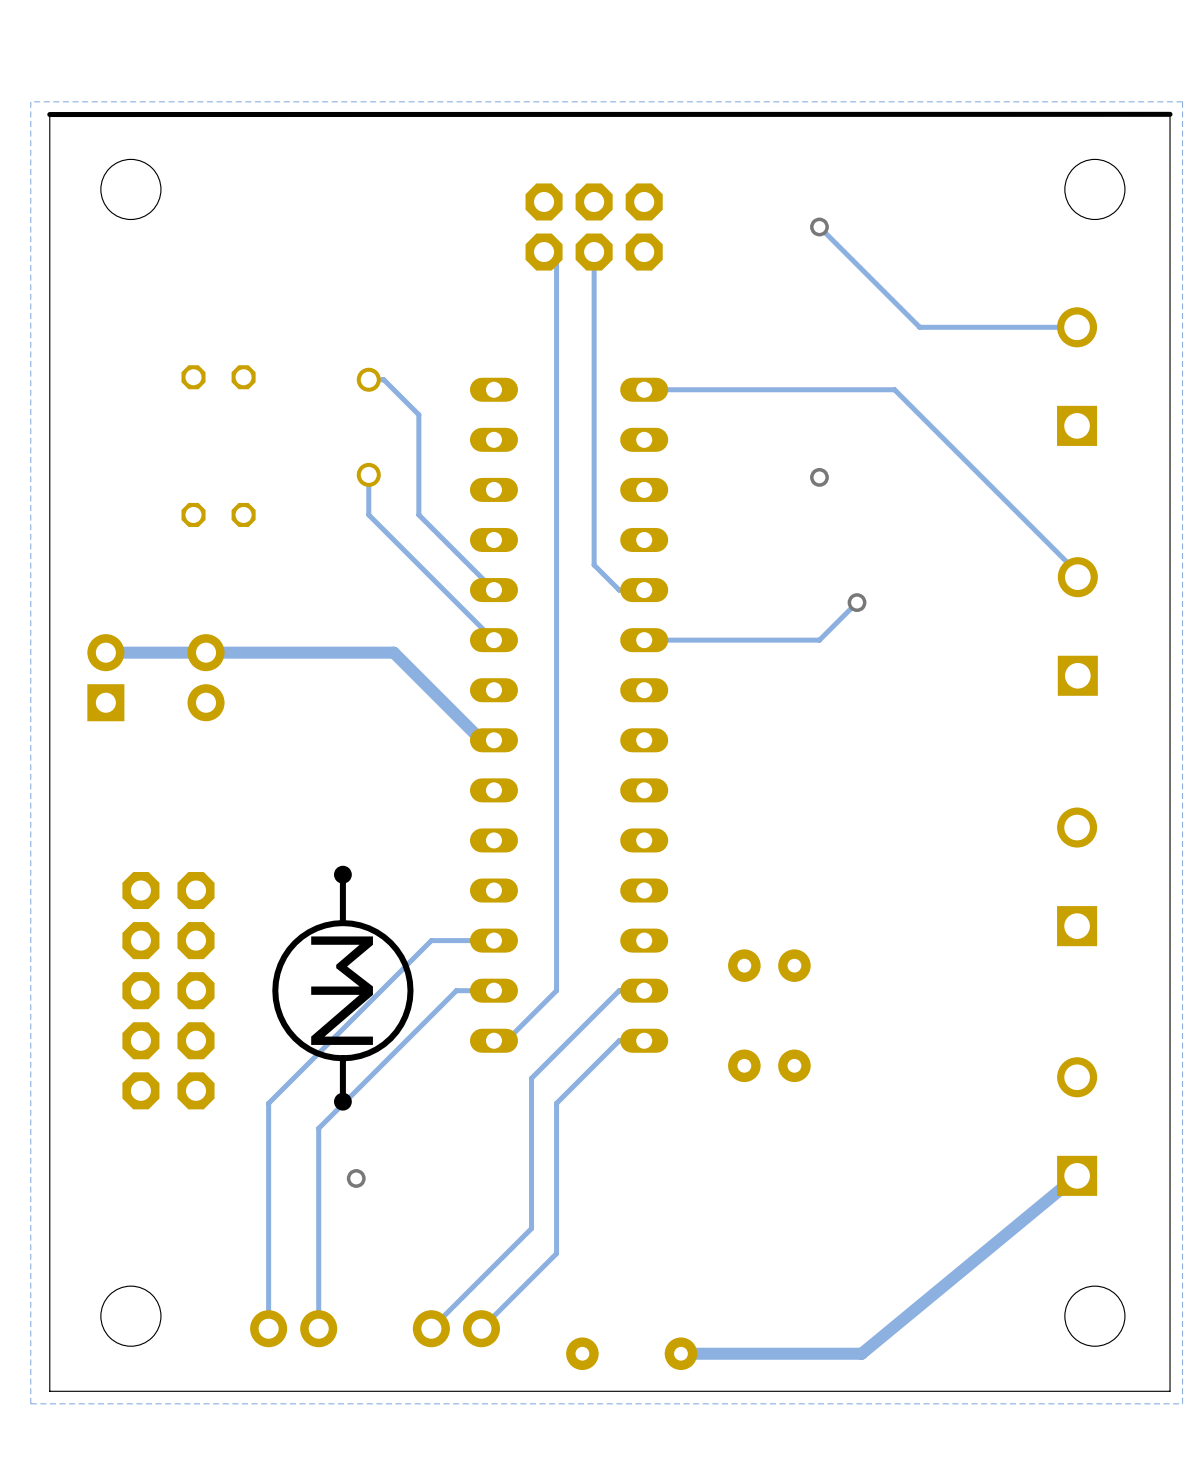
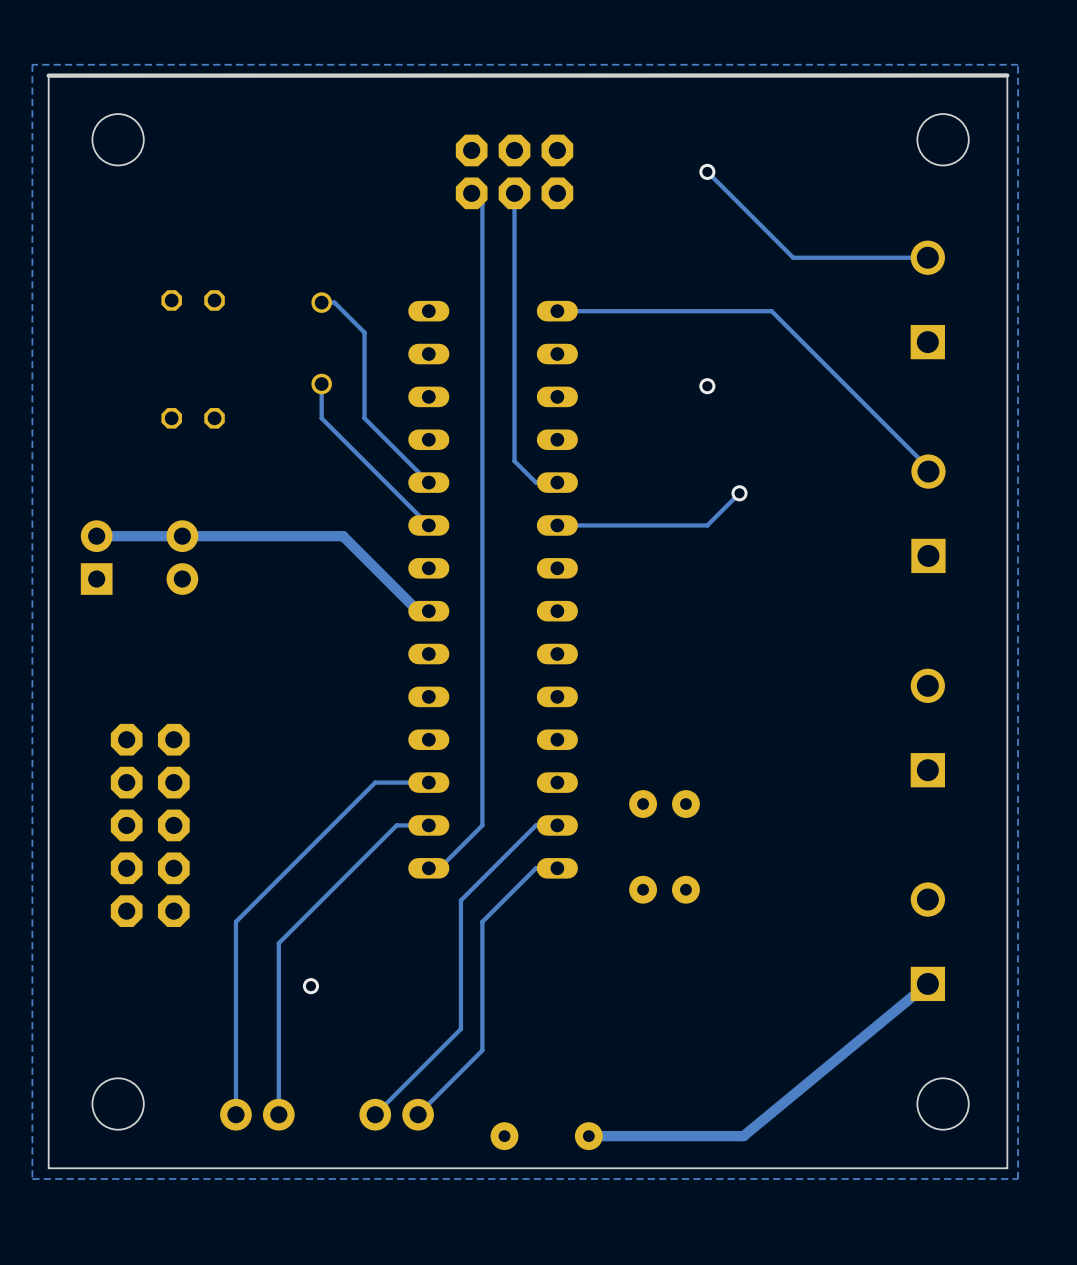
drawing: [272, 865, 414, 1111] -> none

